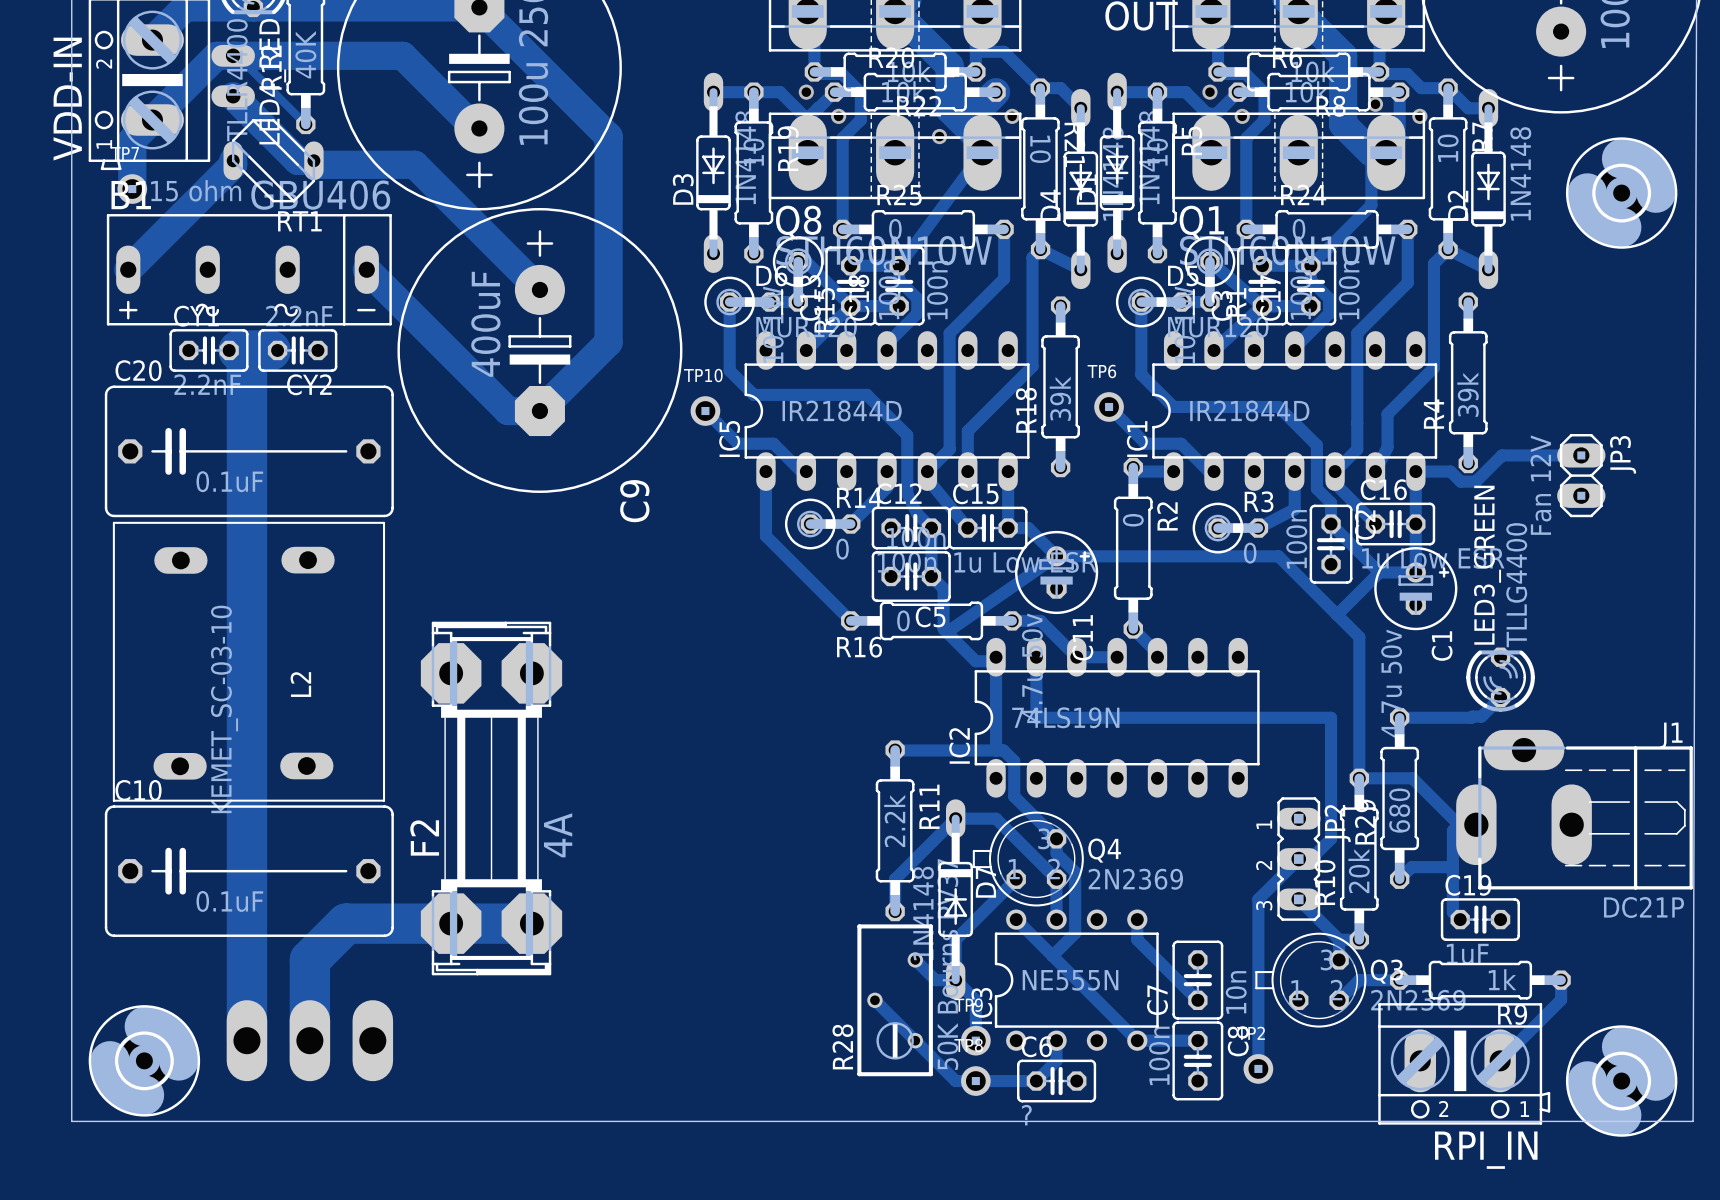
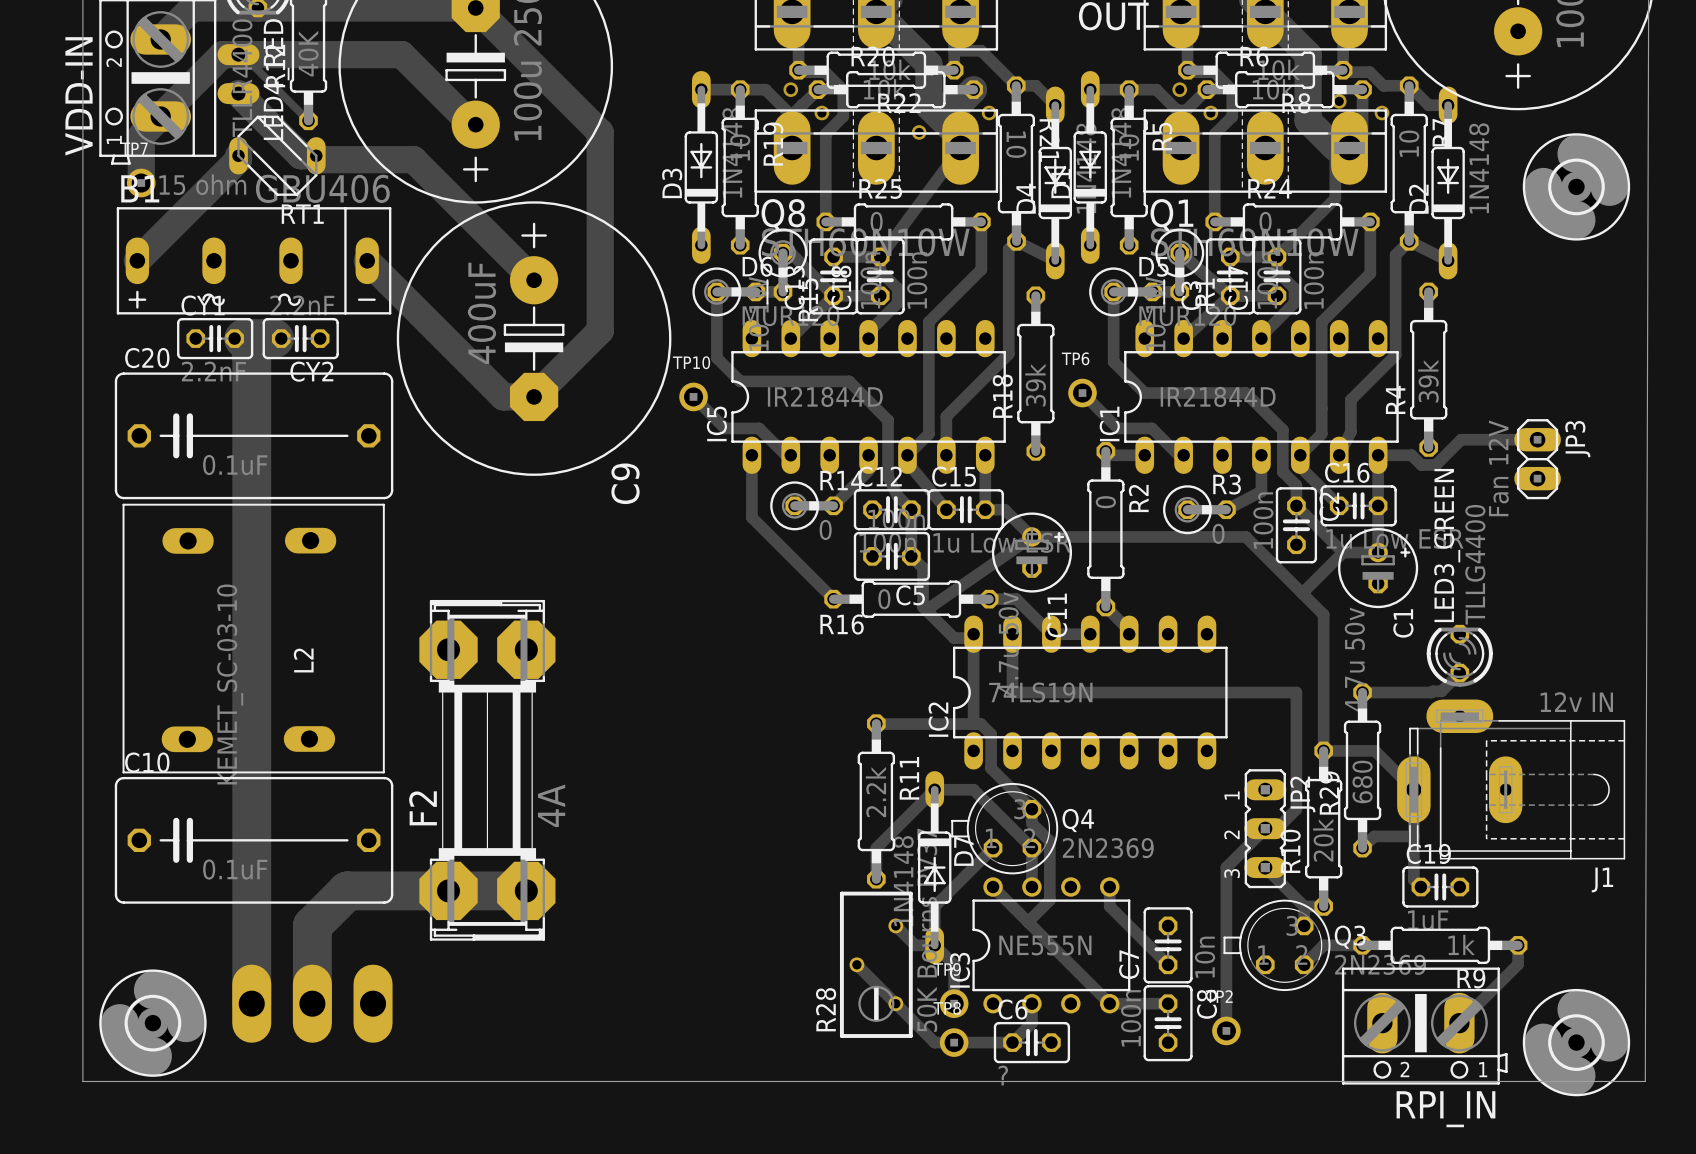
J1 footprint: [1456, 729, 1693, 890] -> [1397, 699, 1626, 860]
J1 name position: J1 (1671, 735) -> J1 (1602, 879)
J1 value: DC21P (1643, 907) -> 12v IN (1576, 702)

